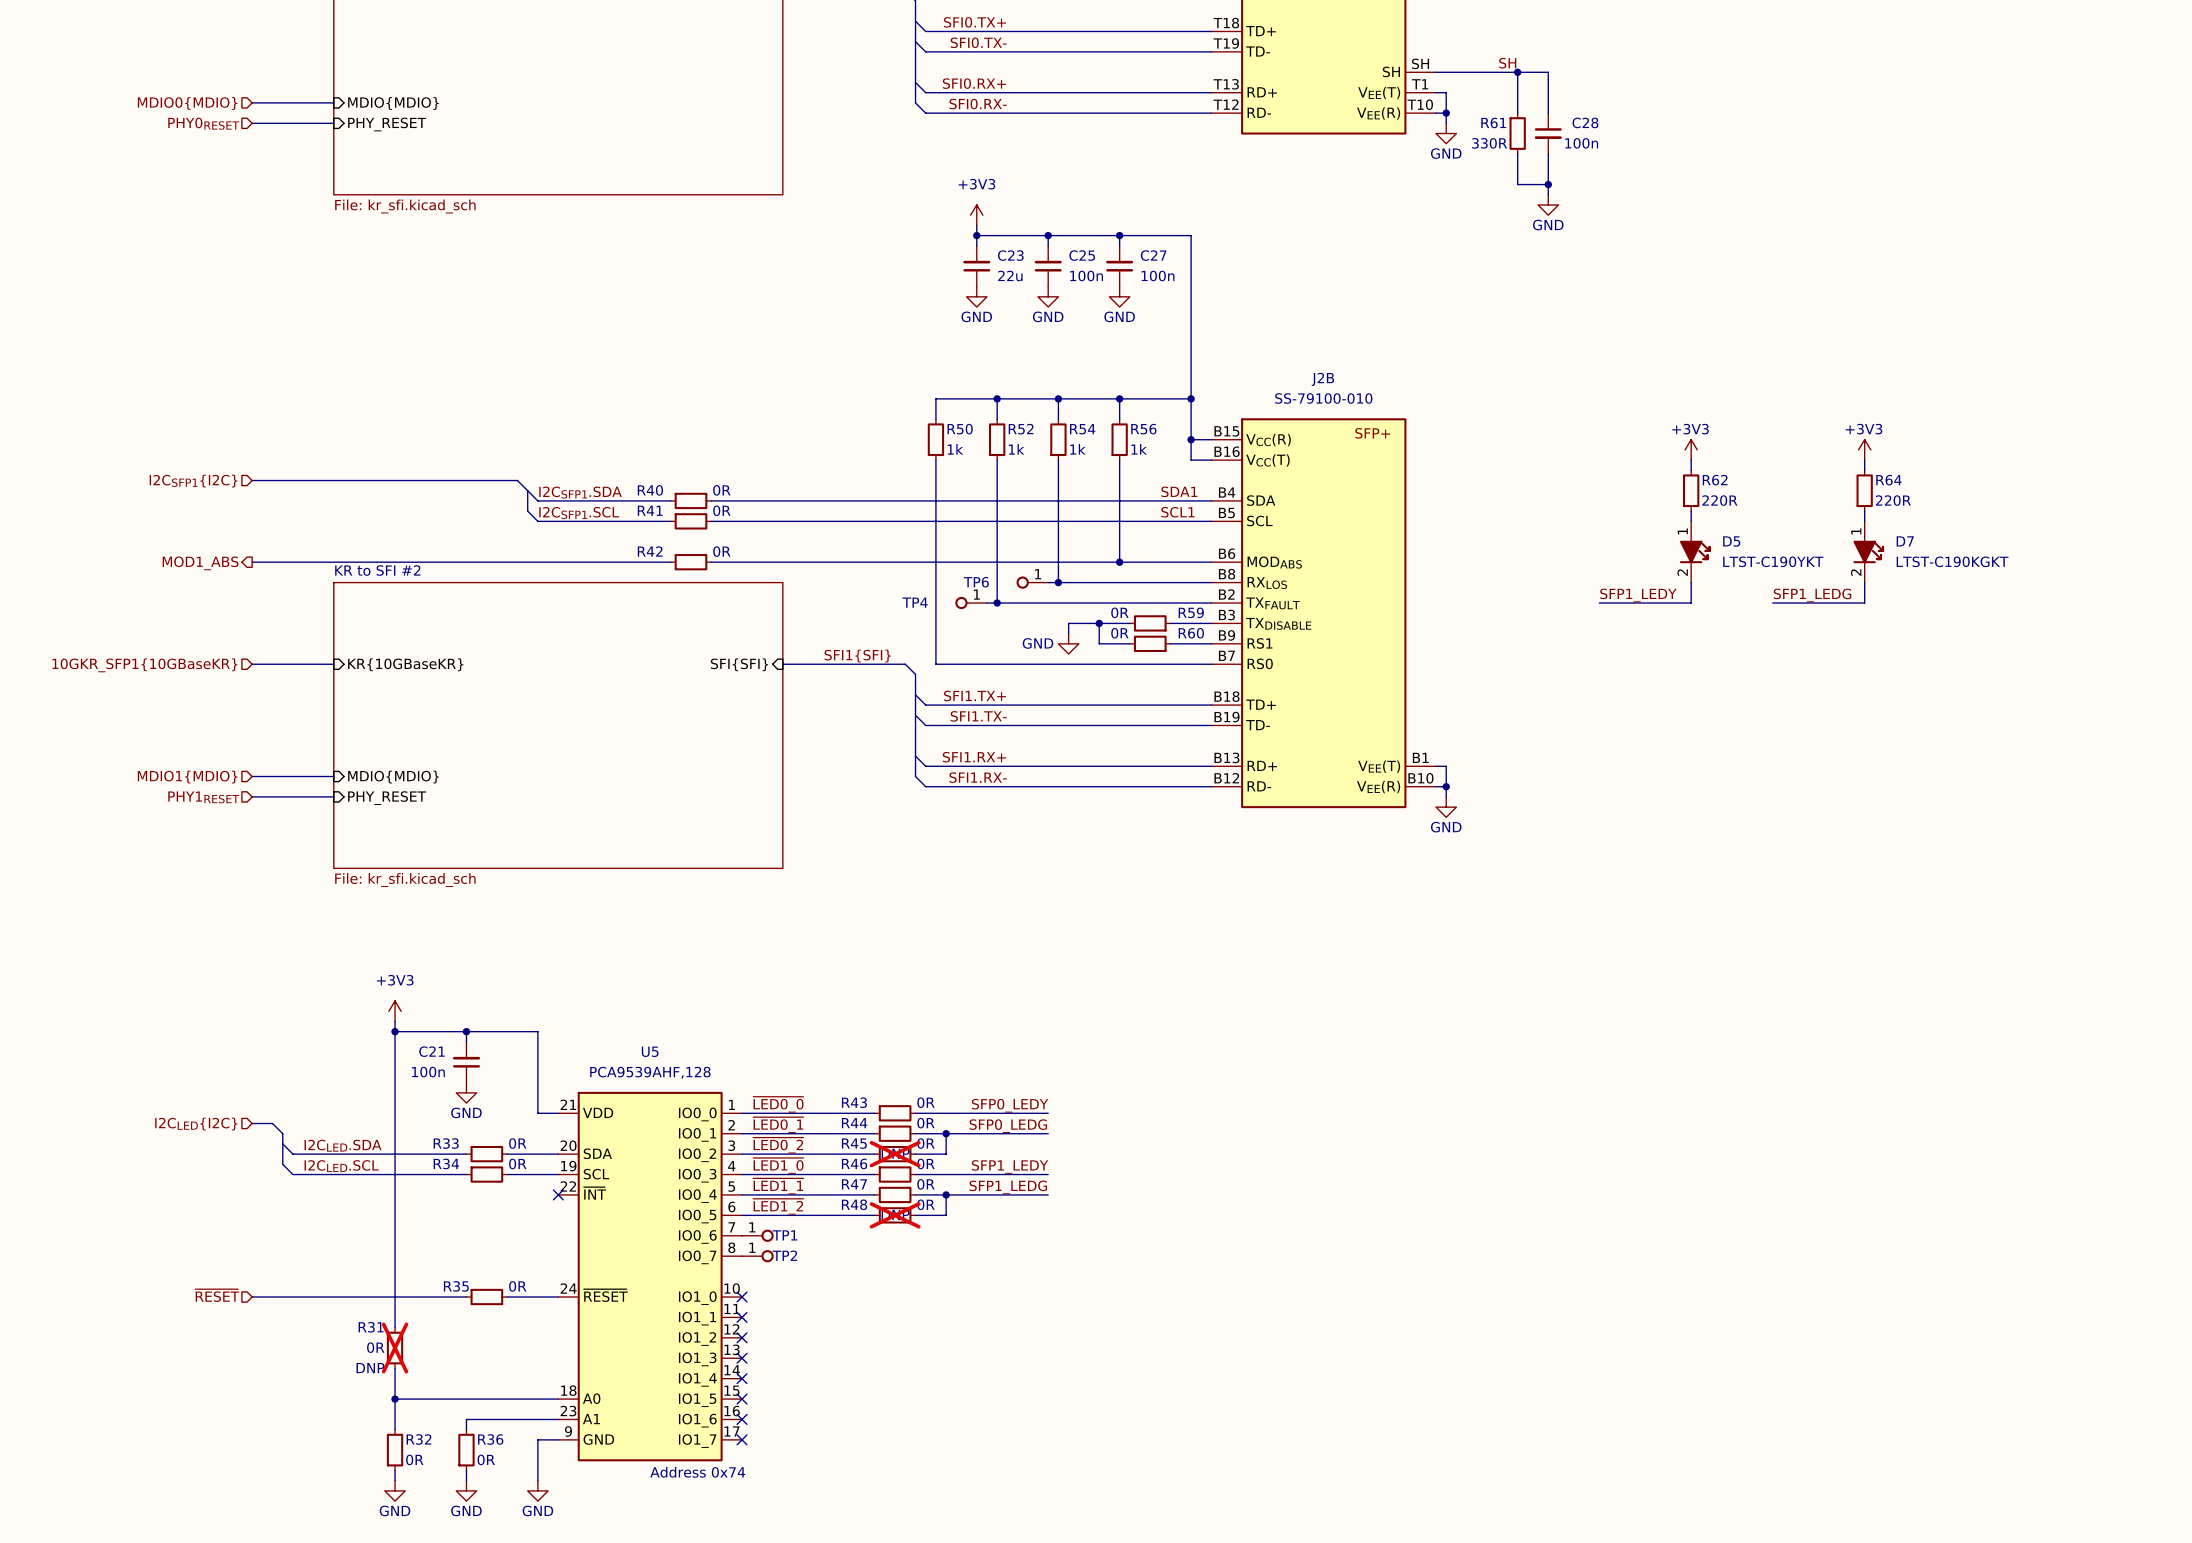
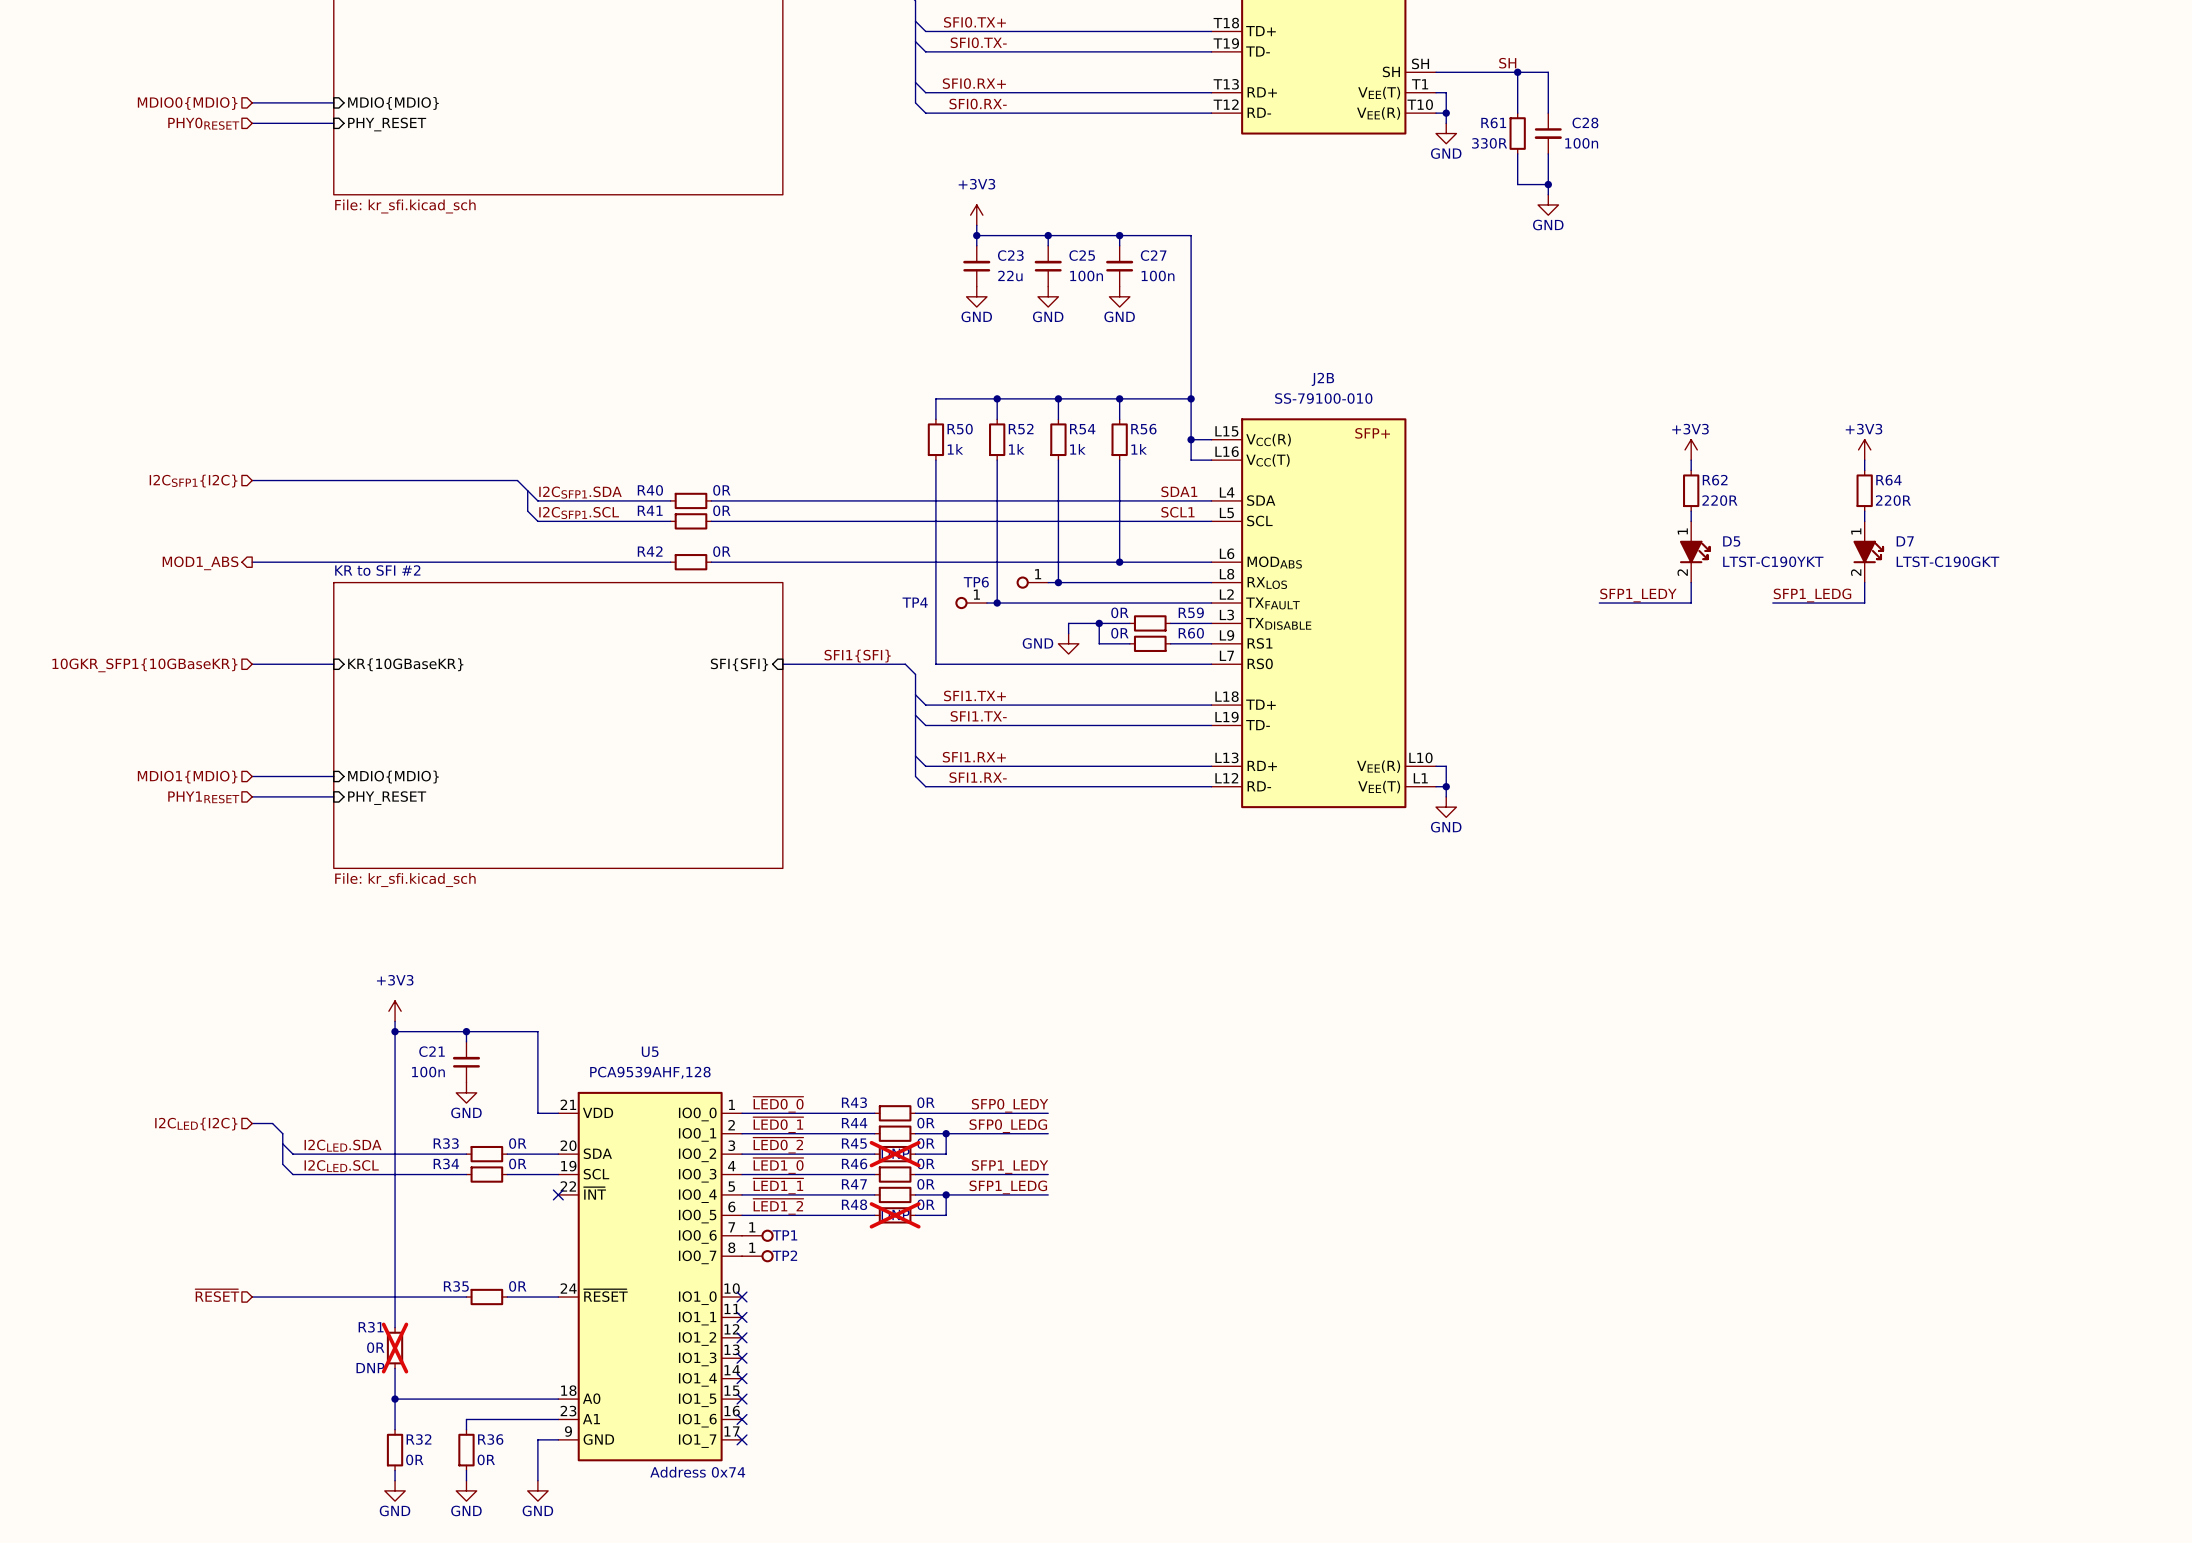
J2B symbol: [1211, 418, 1437, 809] -> [1211, 418, 1437, 809]
D7 text: LTST-C190KGKT (1952, 561) -> LTST-C190GKT (1947, 561)

